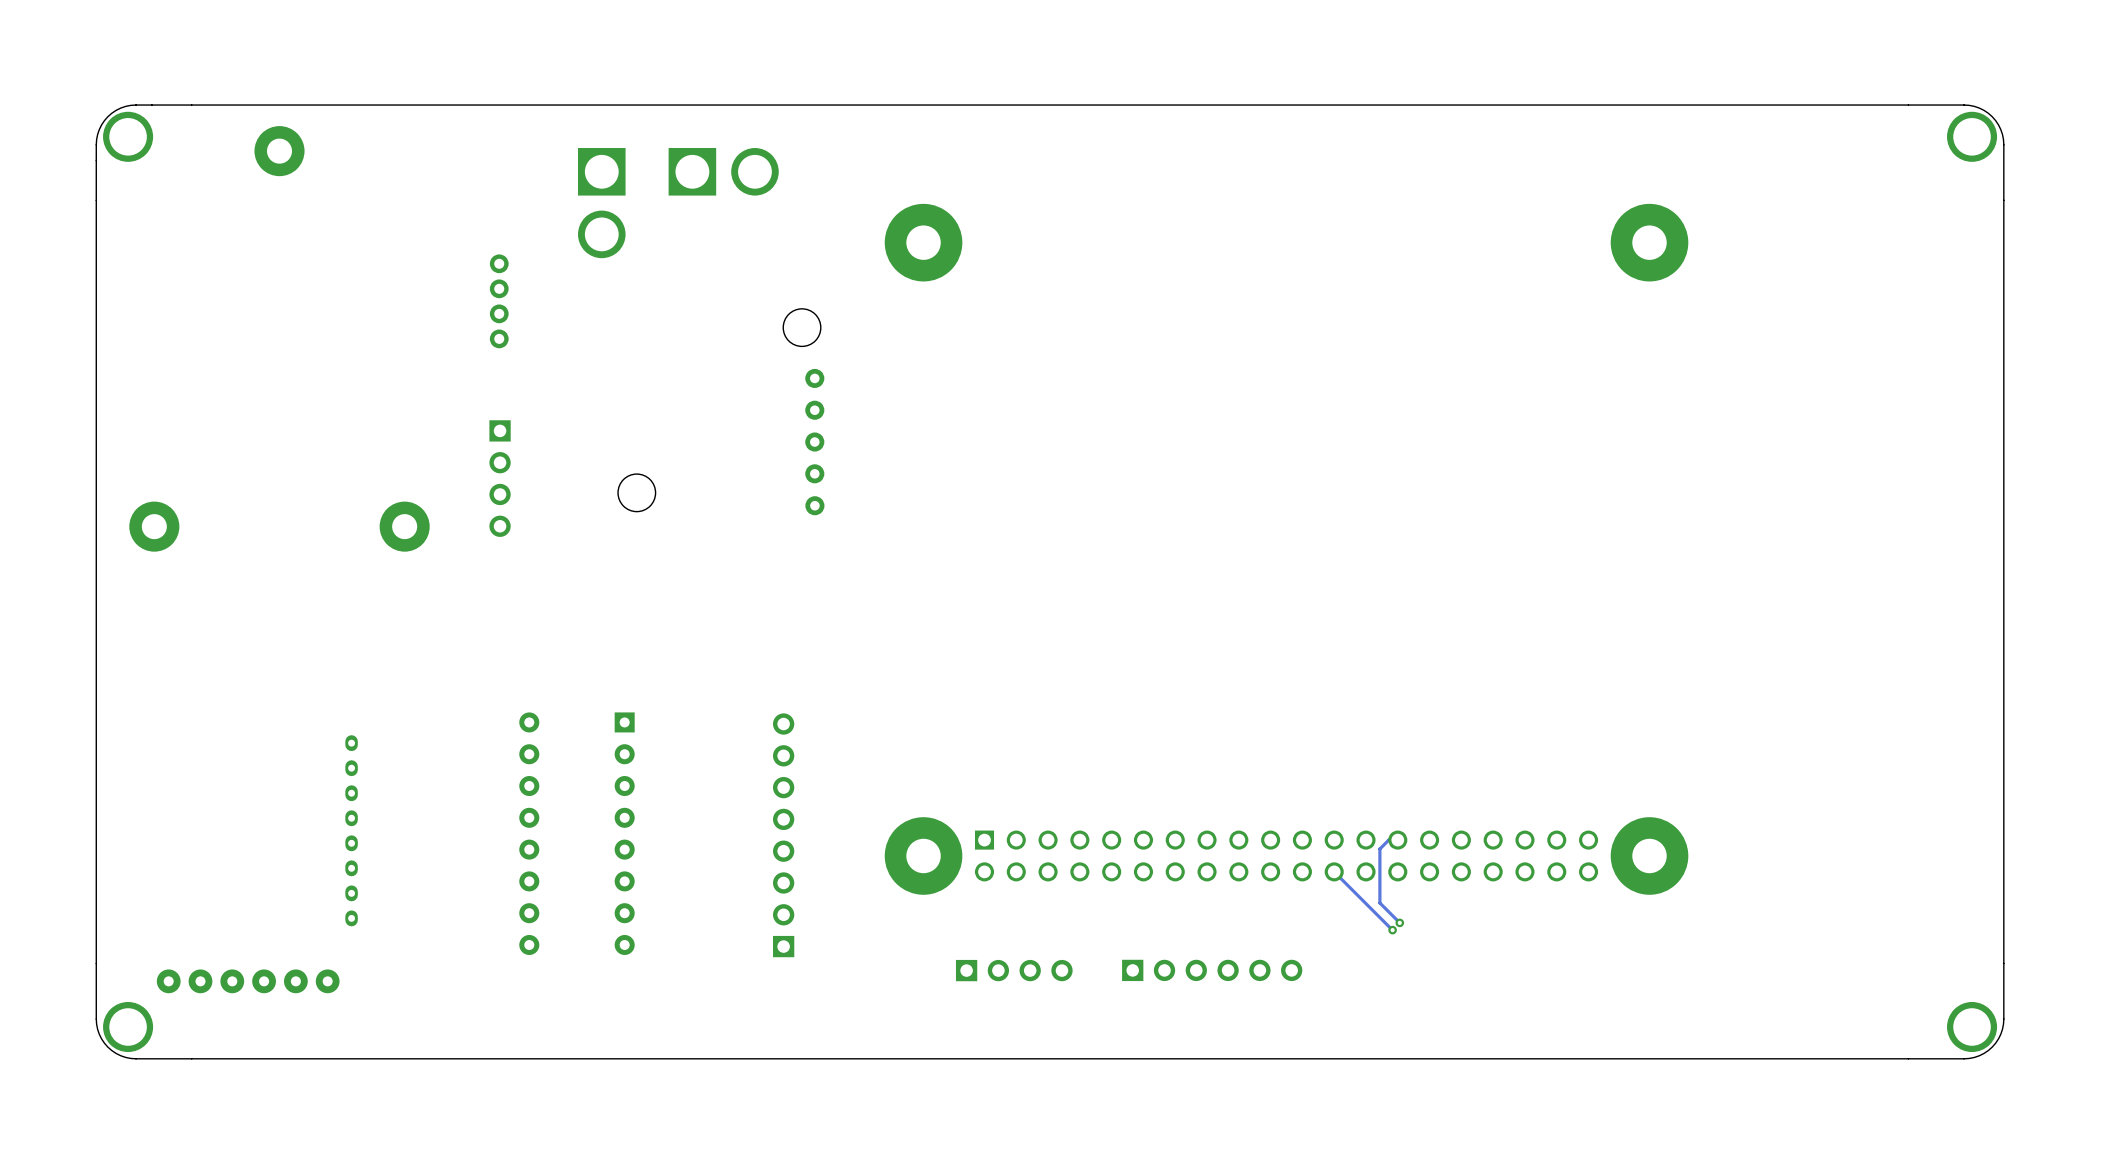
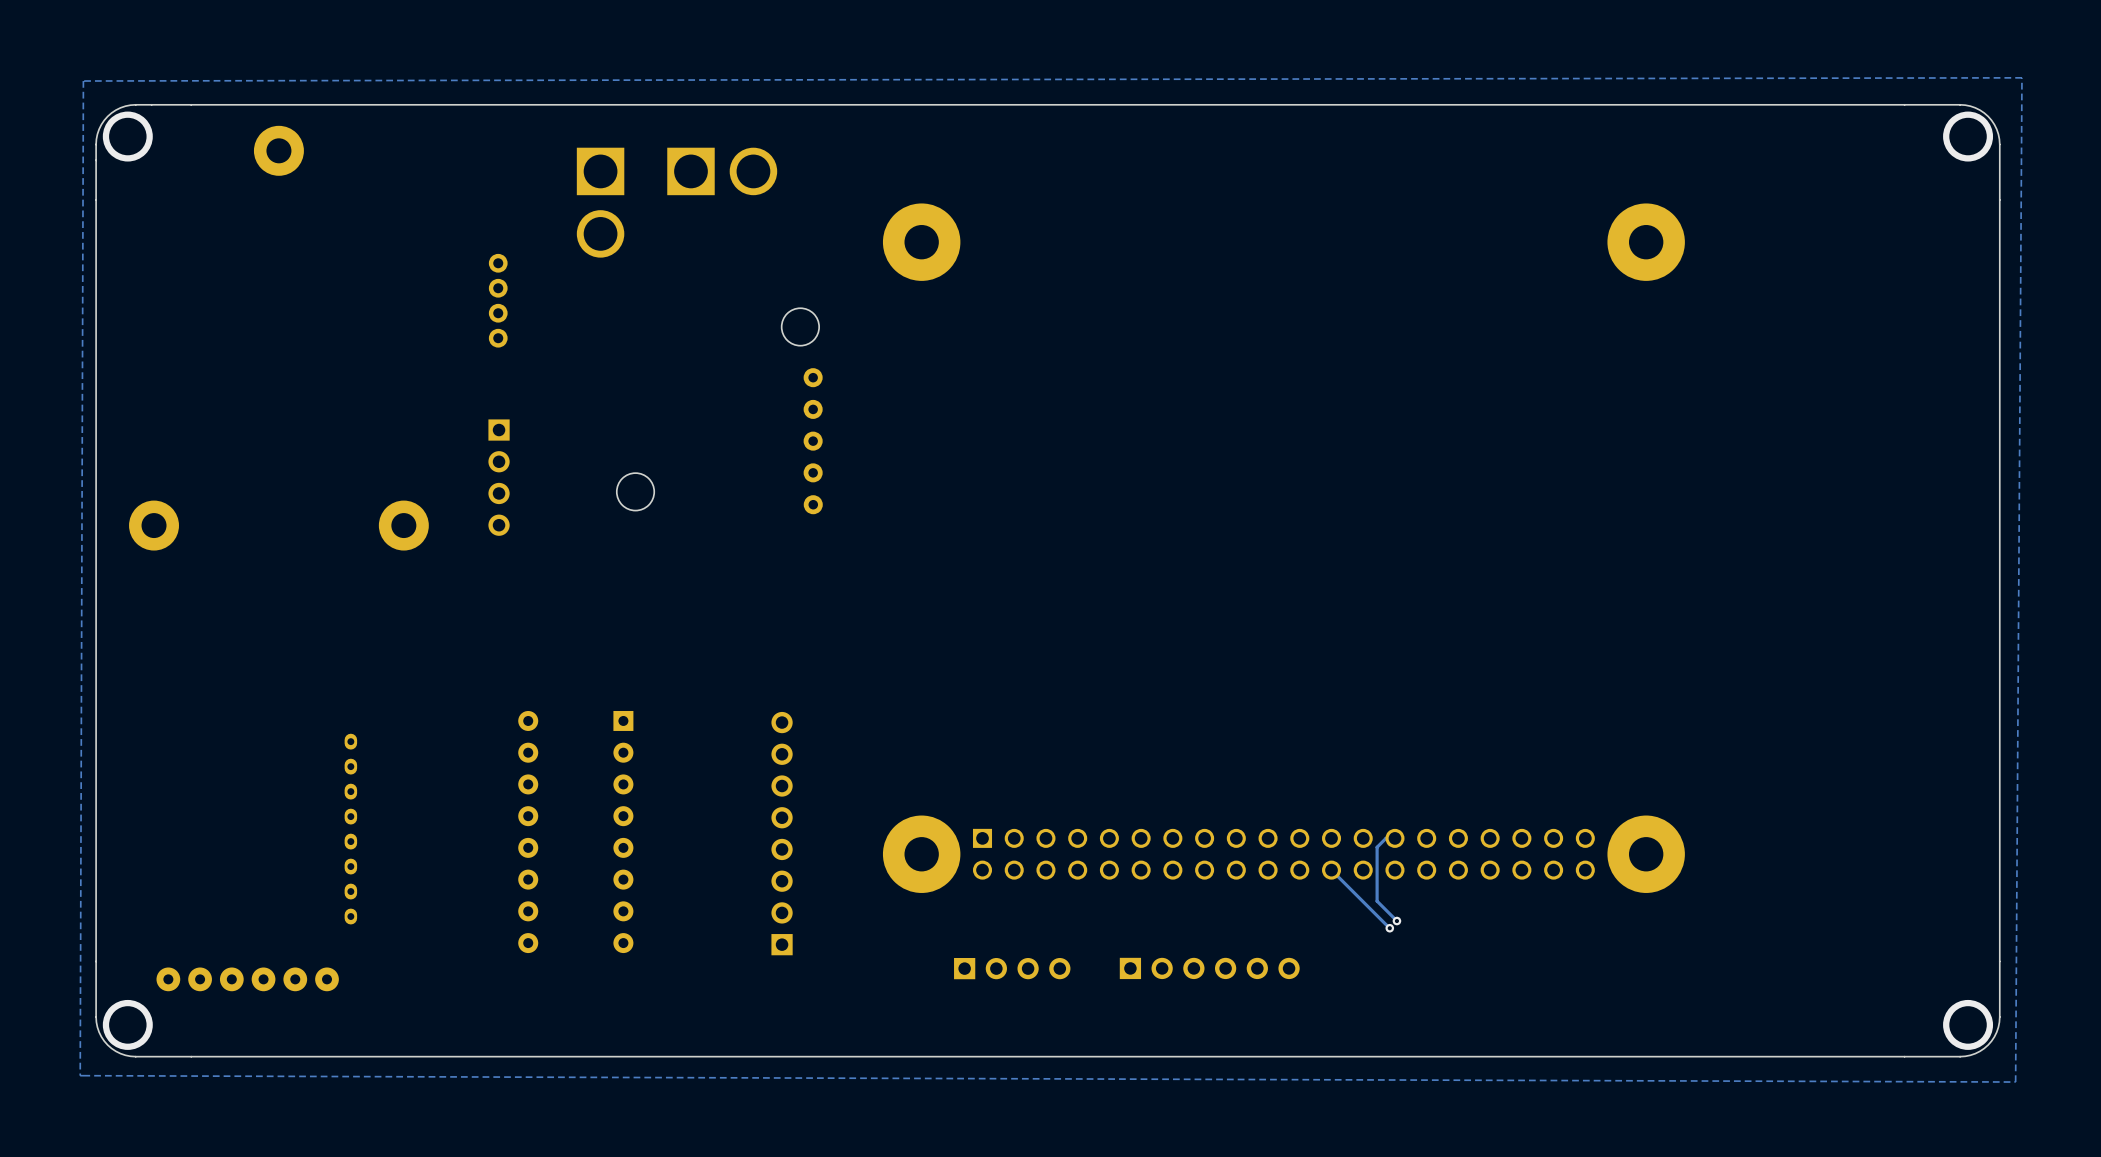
zone outline: none -> (2021, 77) (2015, 1082) (80, 1075) (83, 81) (2021, 77)

